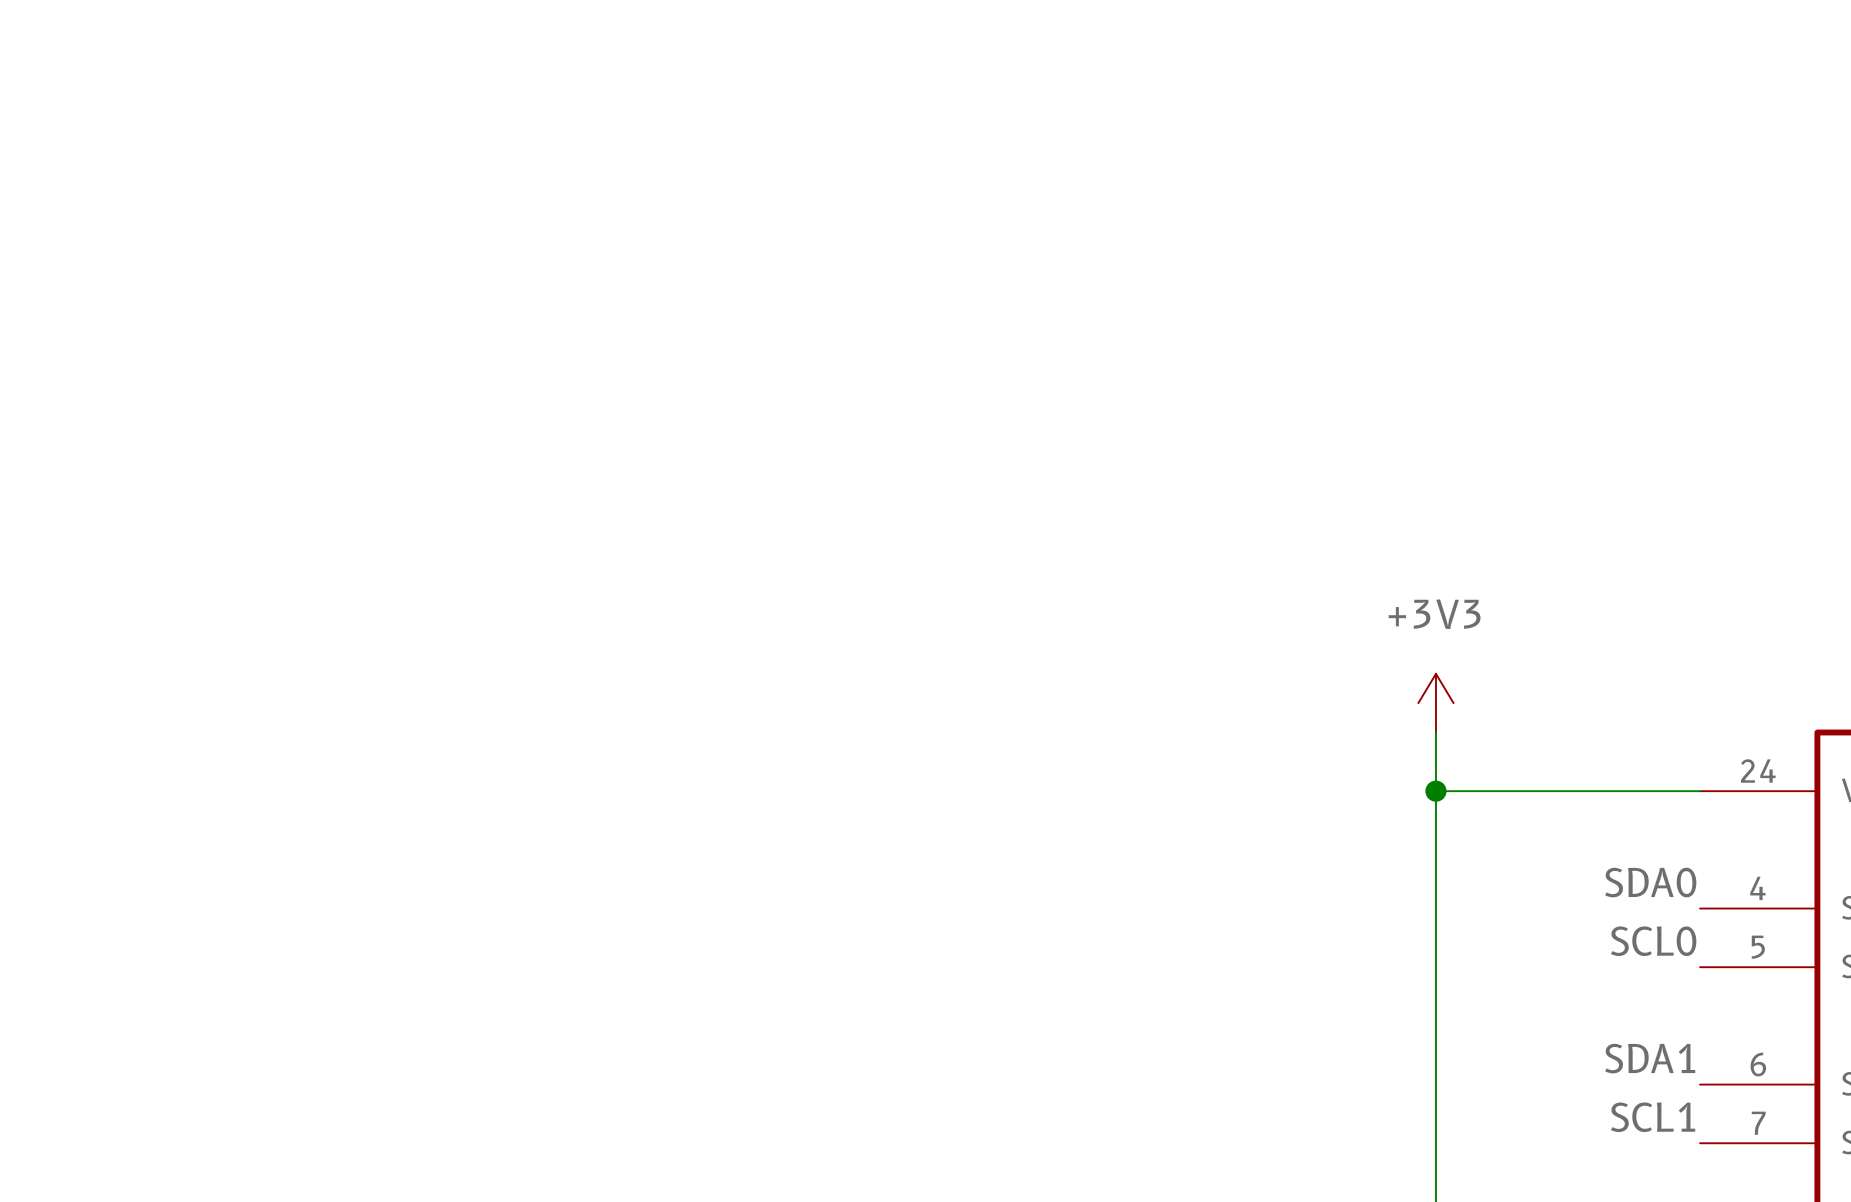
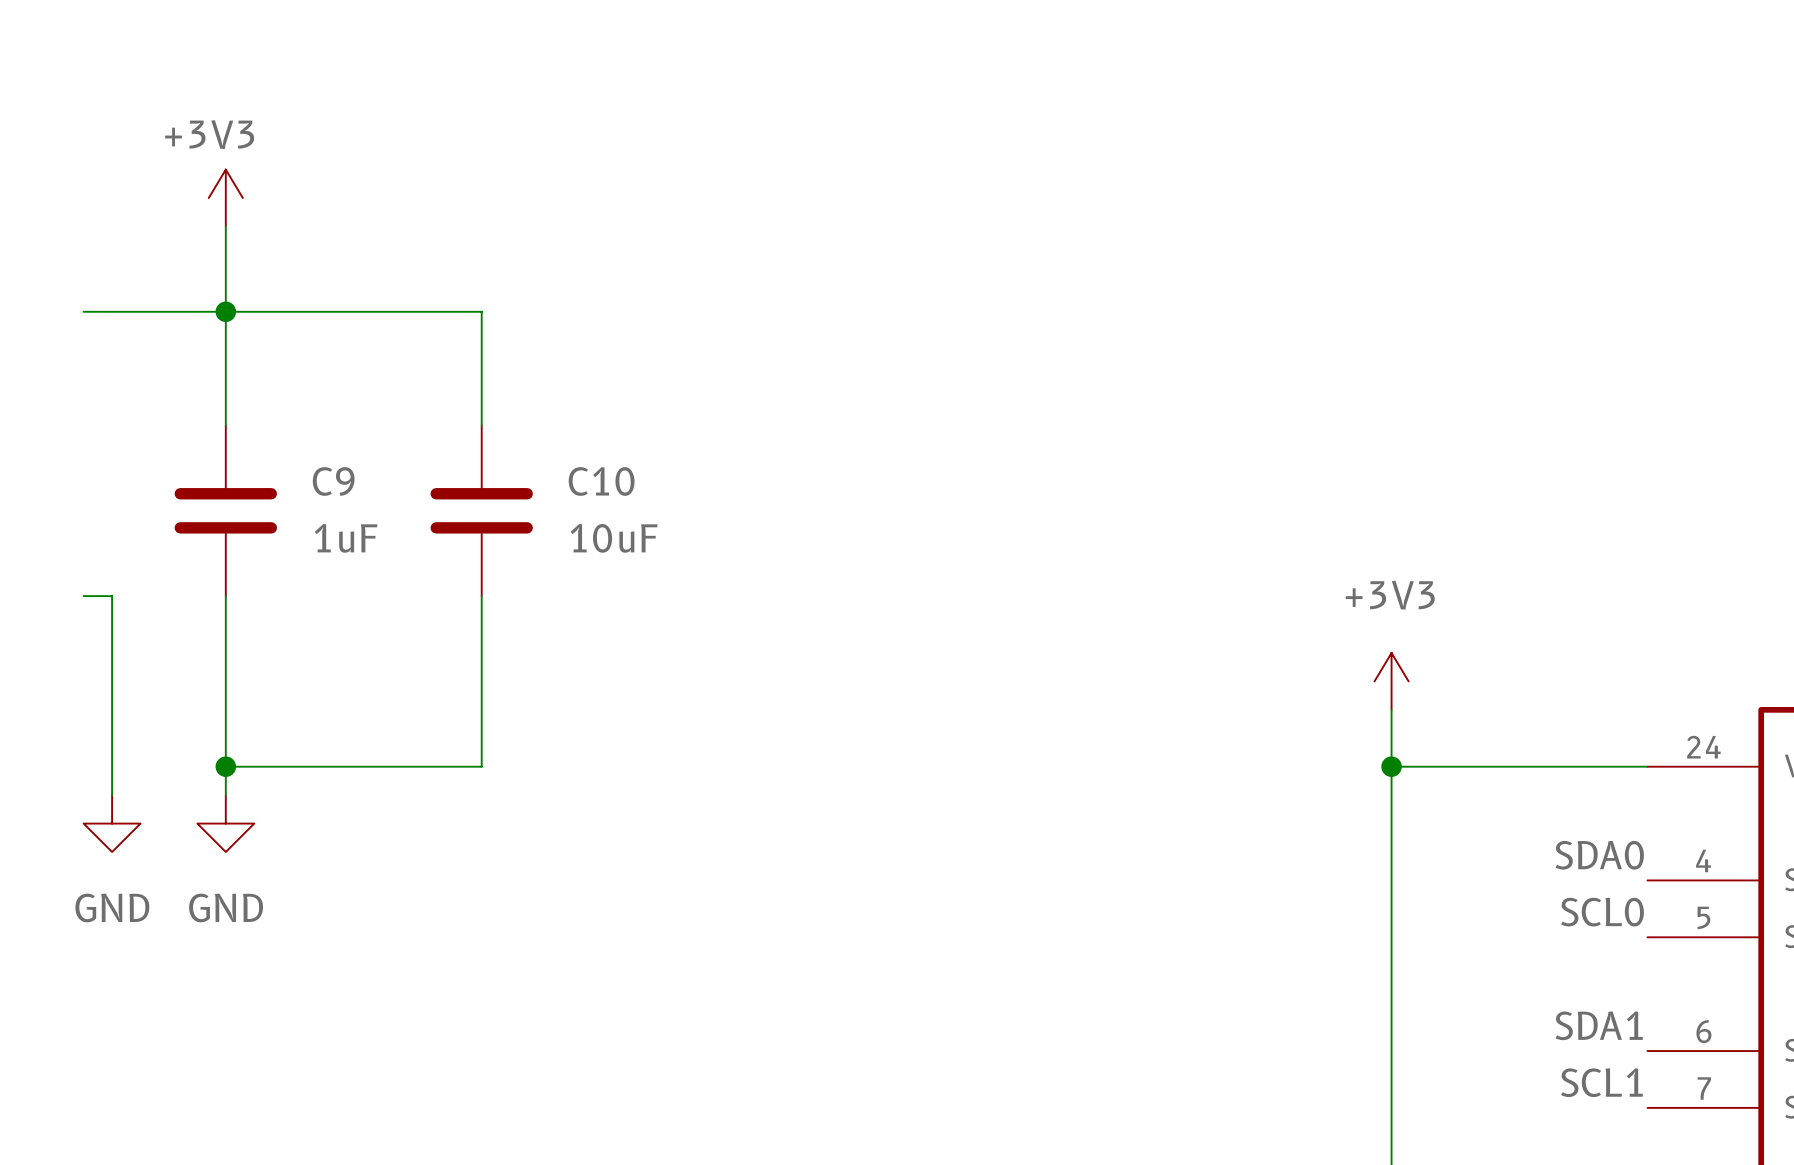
power symbol: none -> +3V3 (225, 198)
wire: none -> (225, 226) (225, 425)
wire: none -> (83, 311) (481, 311) (481, 425)
junction: none -> (225, 311)
C9: none -> 1uF (225, 510)
C10: none -> 10uF (481, 510)
wire: none -> (83, 596) (112, 596) (112, 795)
wire: none -> (225, 596) (225, 795)
wire: none -> (481, 596) (481, 766) (225, 766)
junction: none -> (225, 766)
power symbol: none -> GND (112, 823)
power symbol: none -> GND (225, 823)

